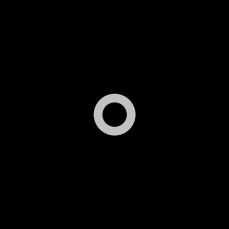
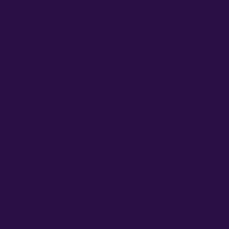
via: (114, 114) -> none

